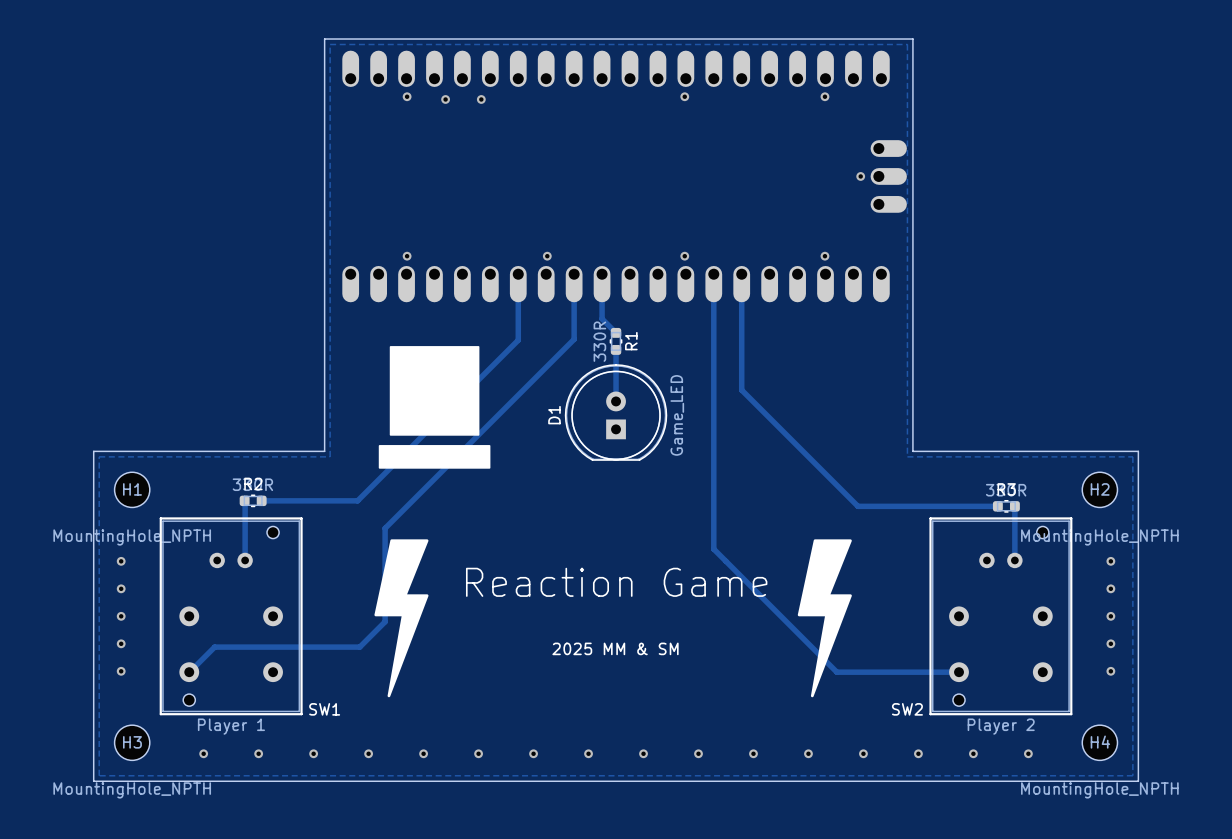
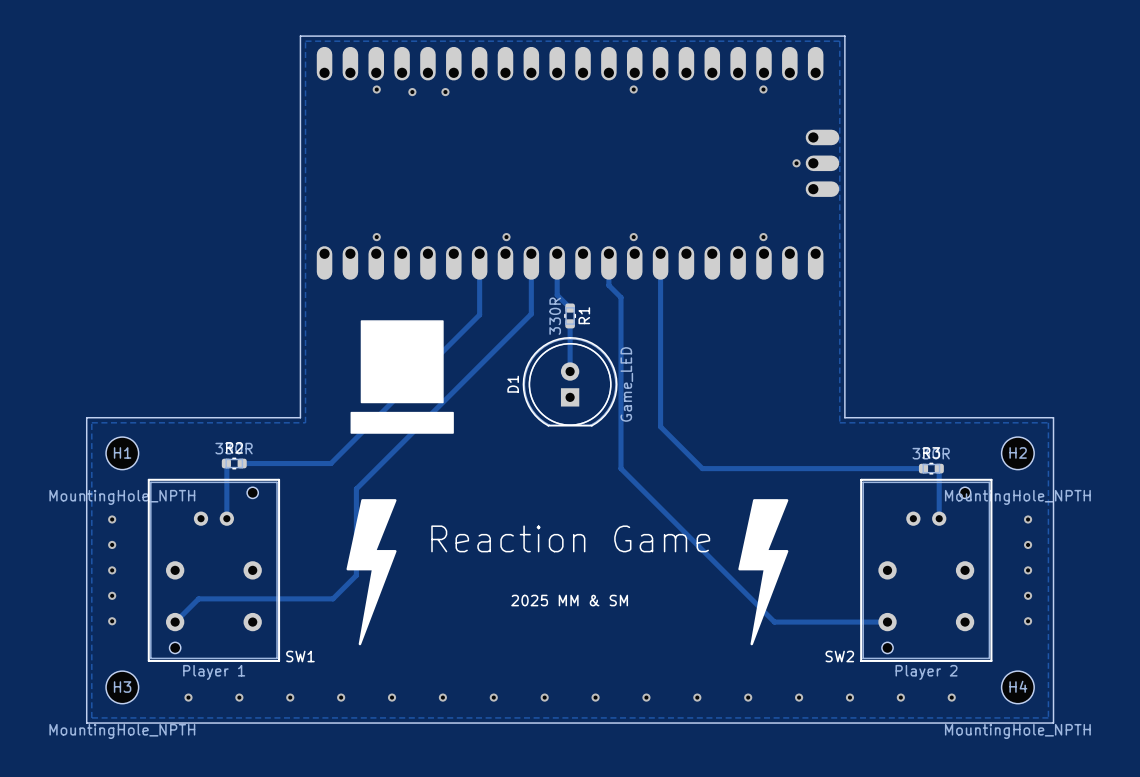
track: none -> (608, 253) (608, 285) (620, 297) (620, 468) (660, 508)
track: (741, 274) (741, 390) (857, 506) -> none
track: (713, 461) (713, 549) -> (660, 426) (702, 468) (794, 468)

